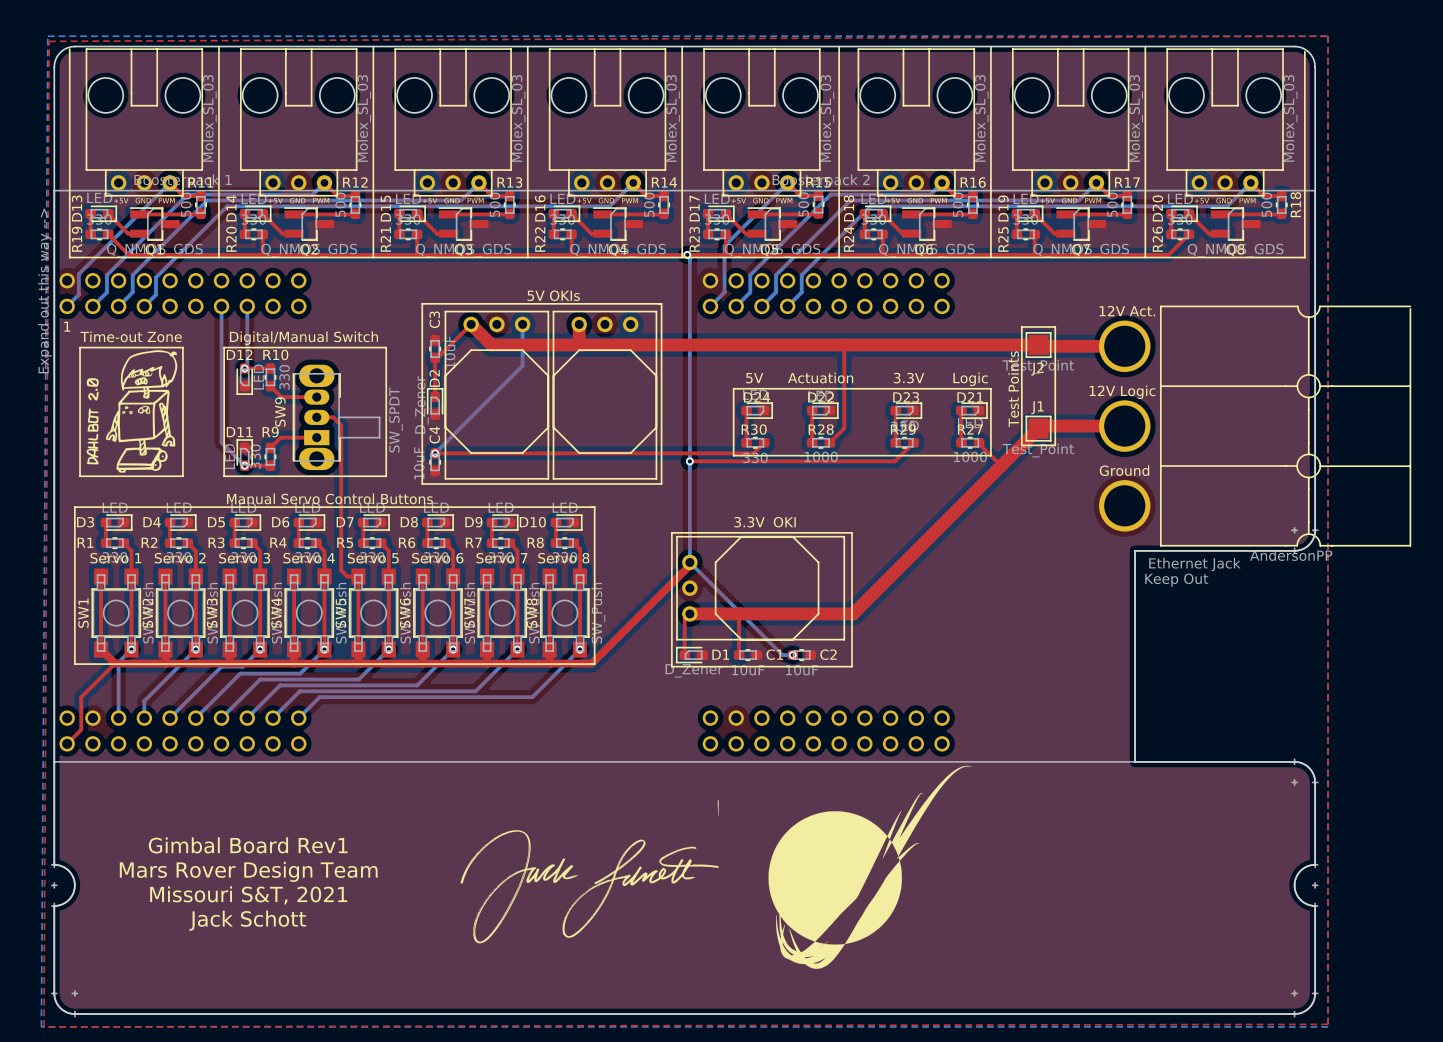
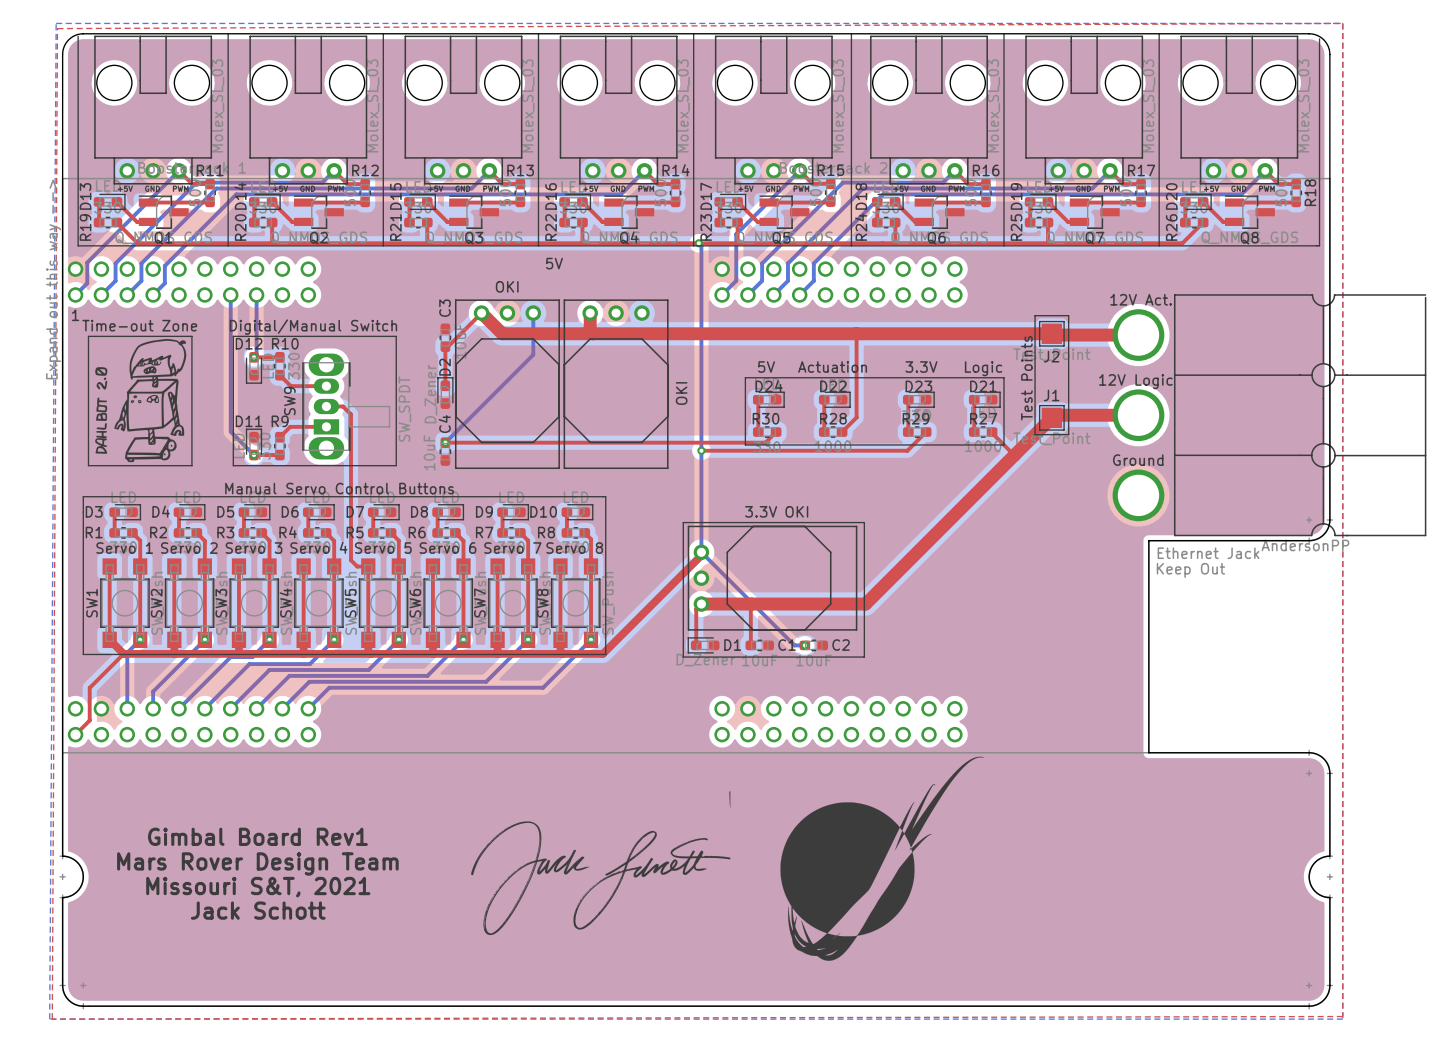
text: none -> 5V (554, 263)
text: 5V OKIs (553, 295) -> none
part value: none -> OKI (507, 286)
line: (422, 303) (661, 303) (661, 483) (422, 483) (422, 303) -> none
part value: none -> OKI (681, 393)

